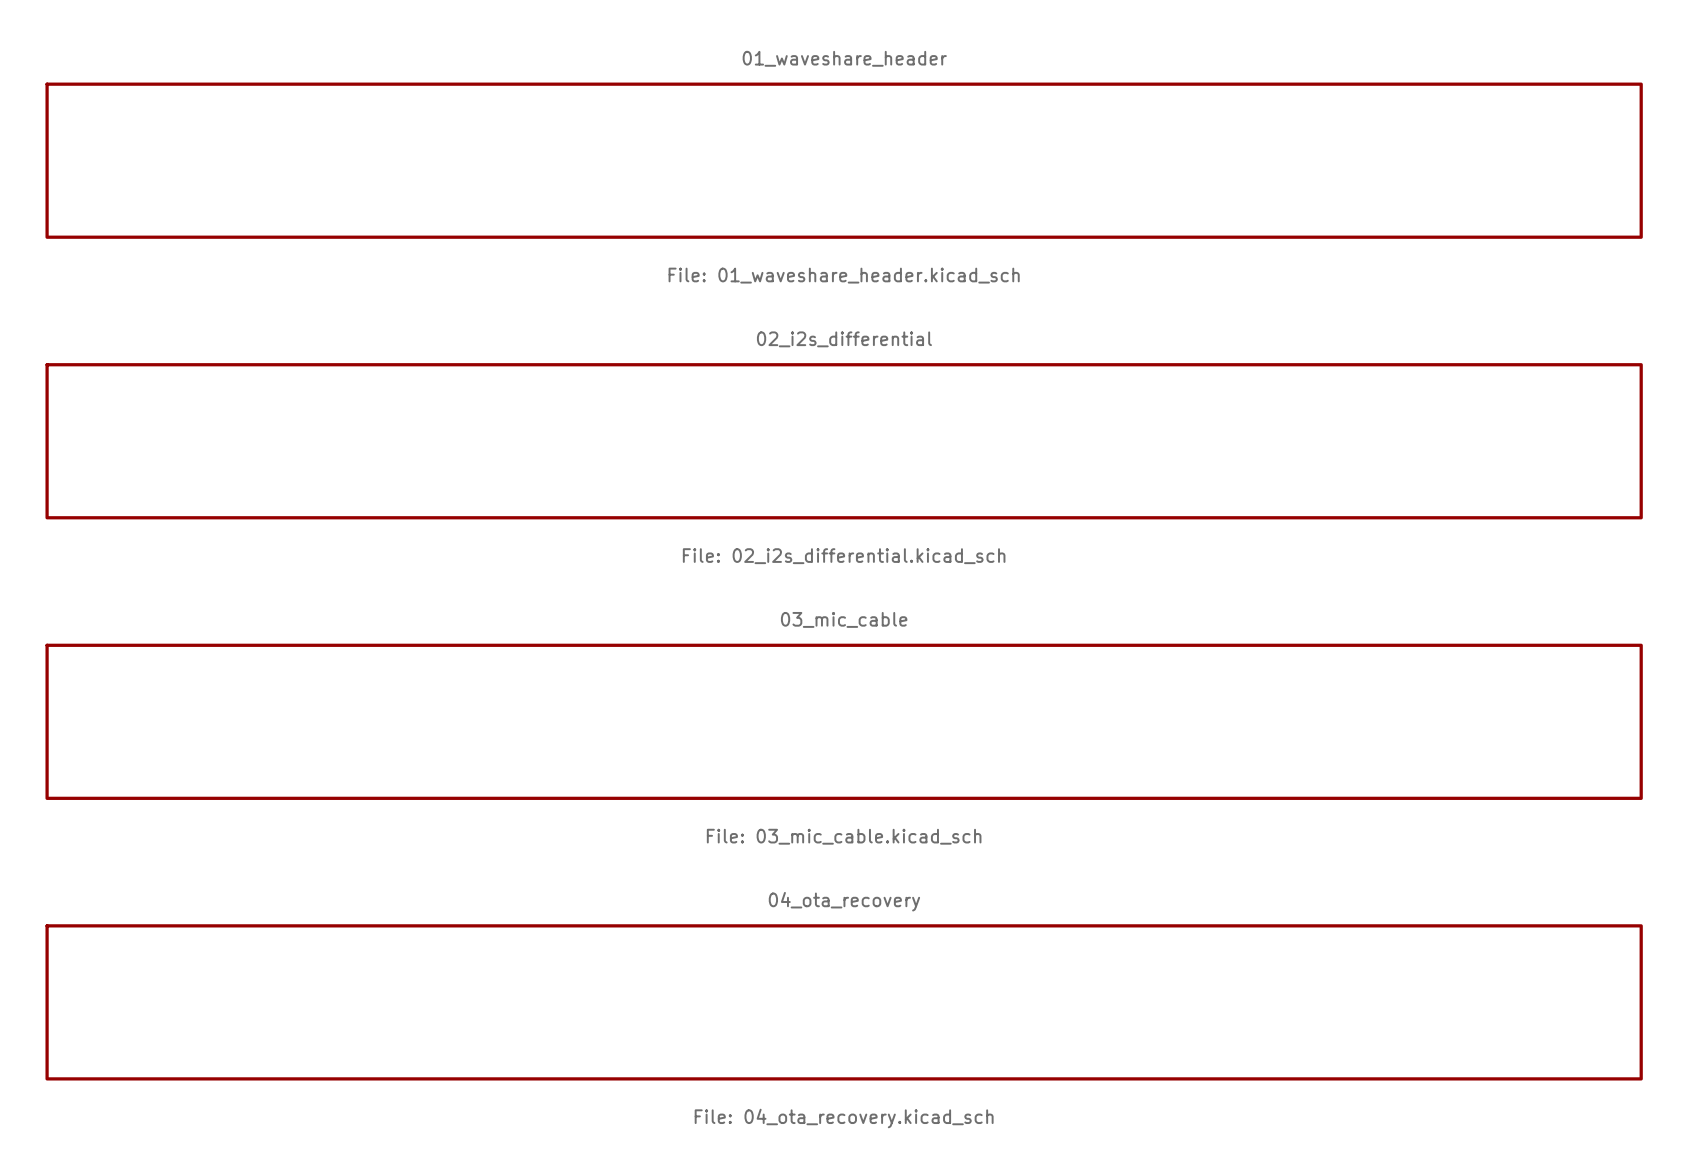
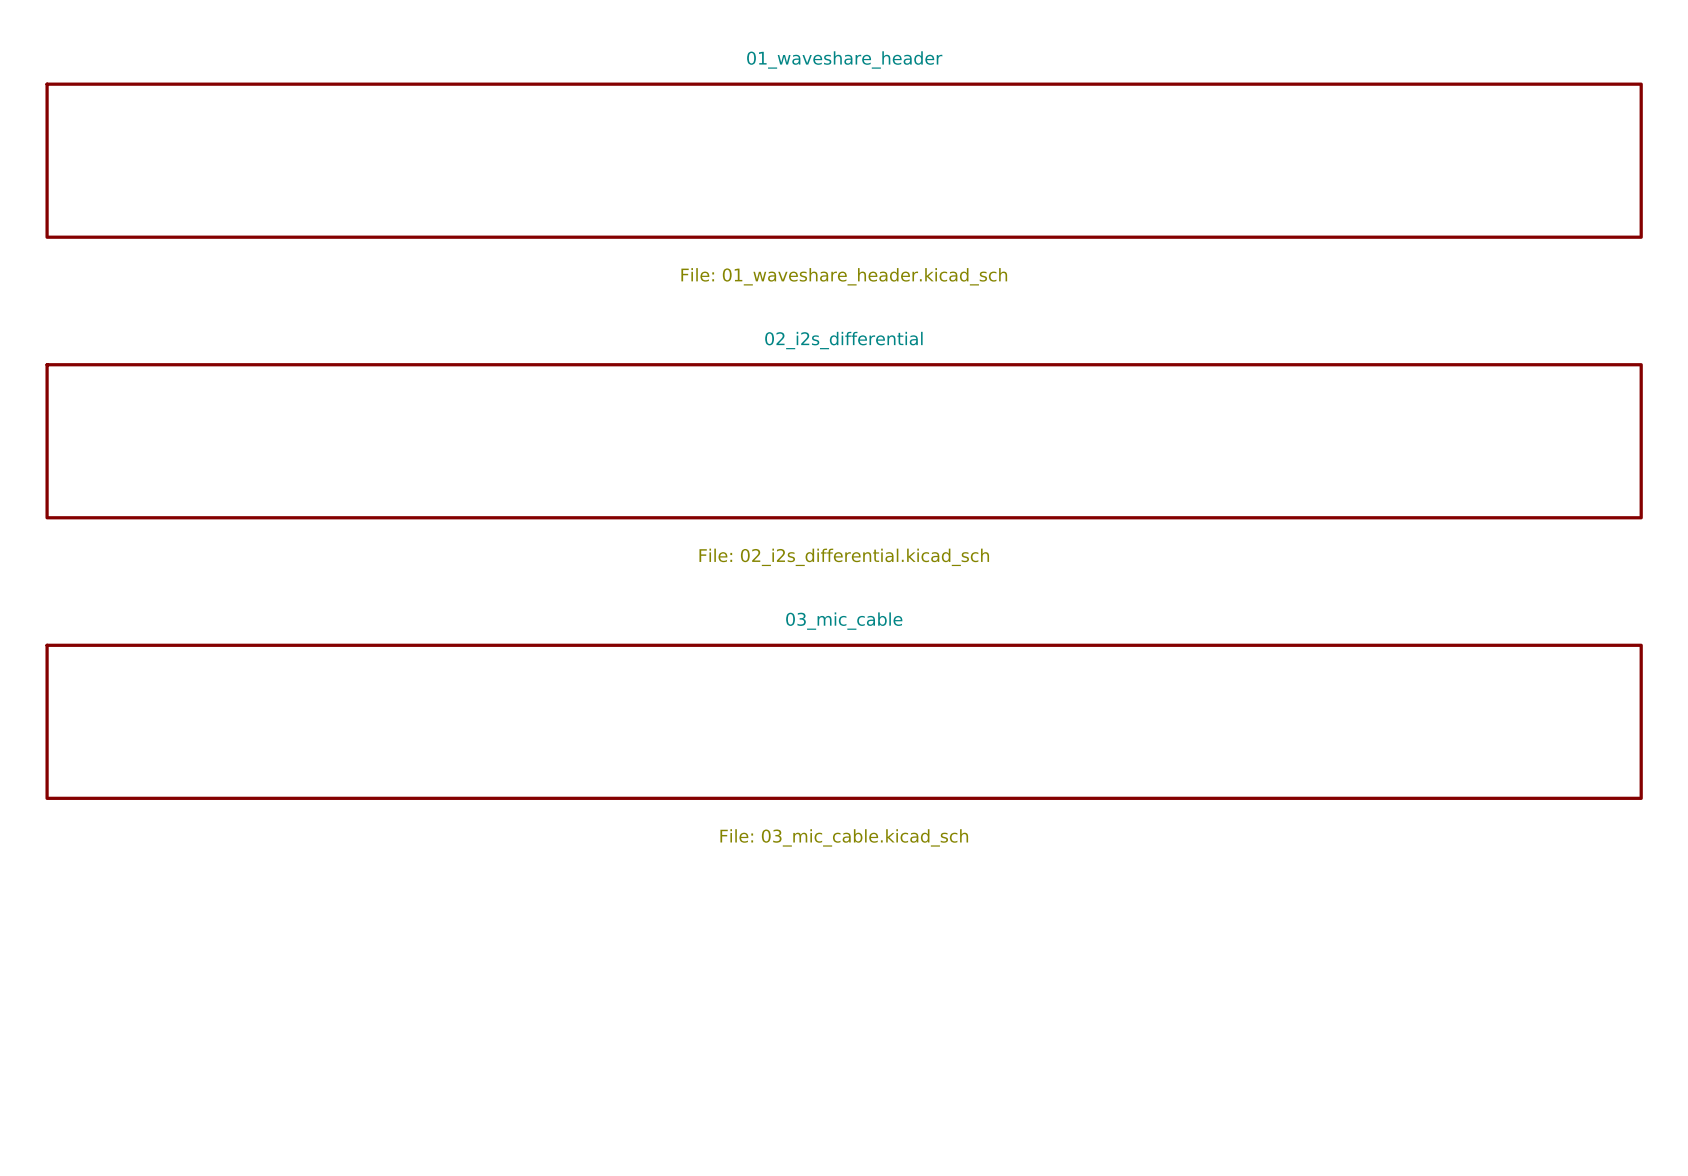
sheet 04_ota_recovery: File: 04_ota_recovery.kicad_sch (844, 1002) -> none

